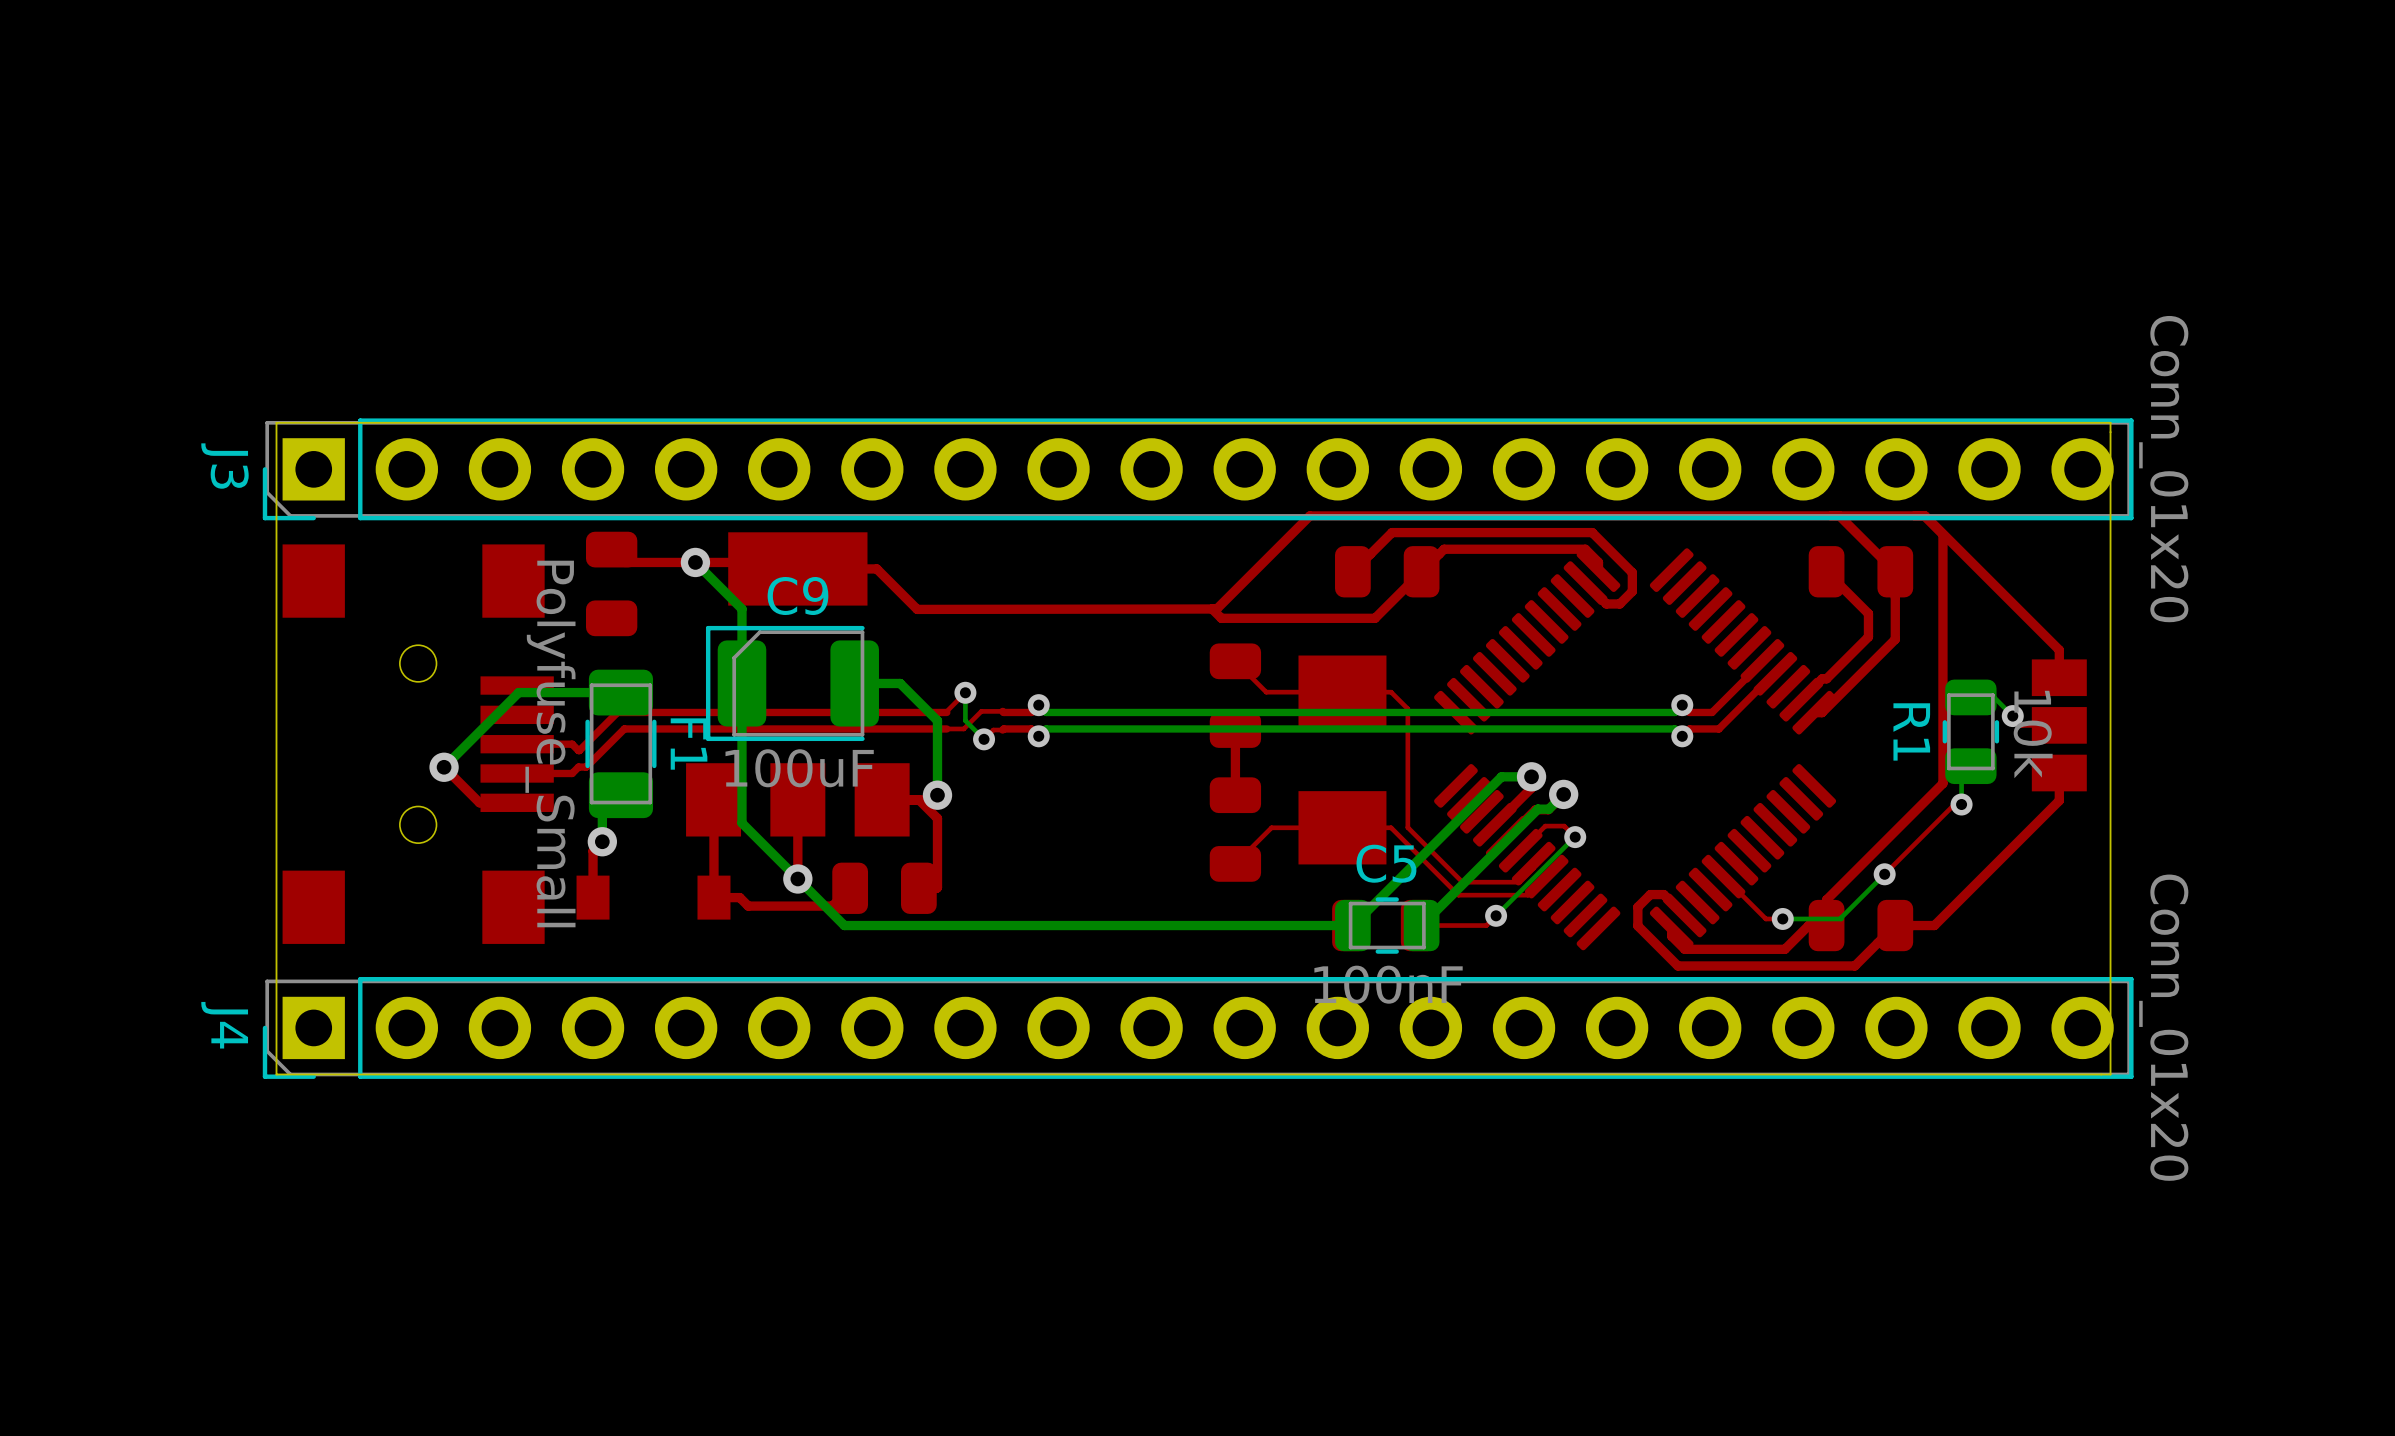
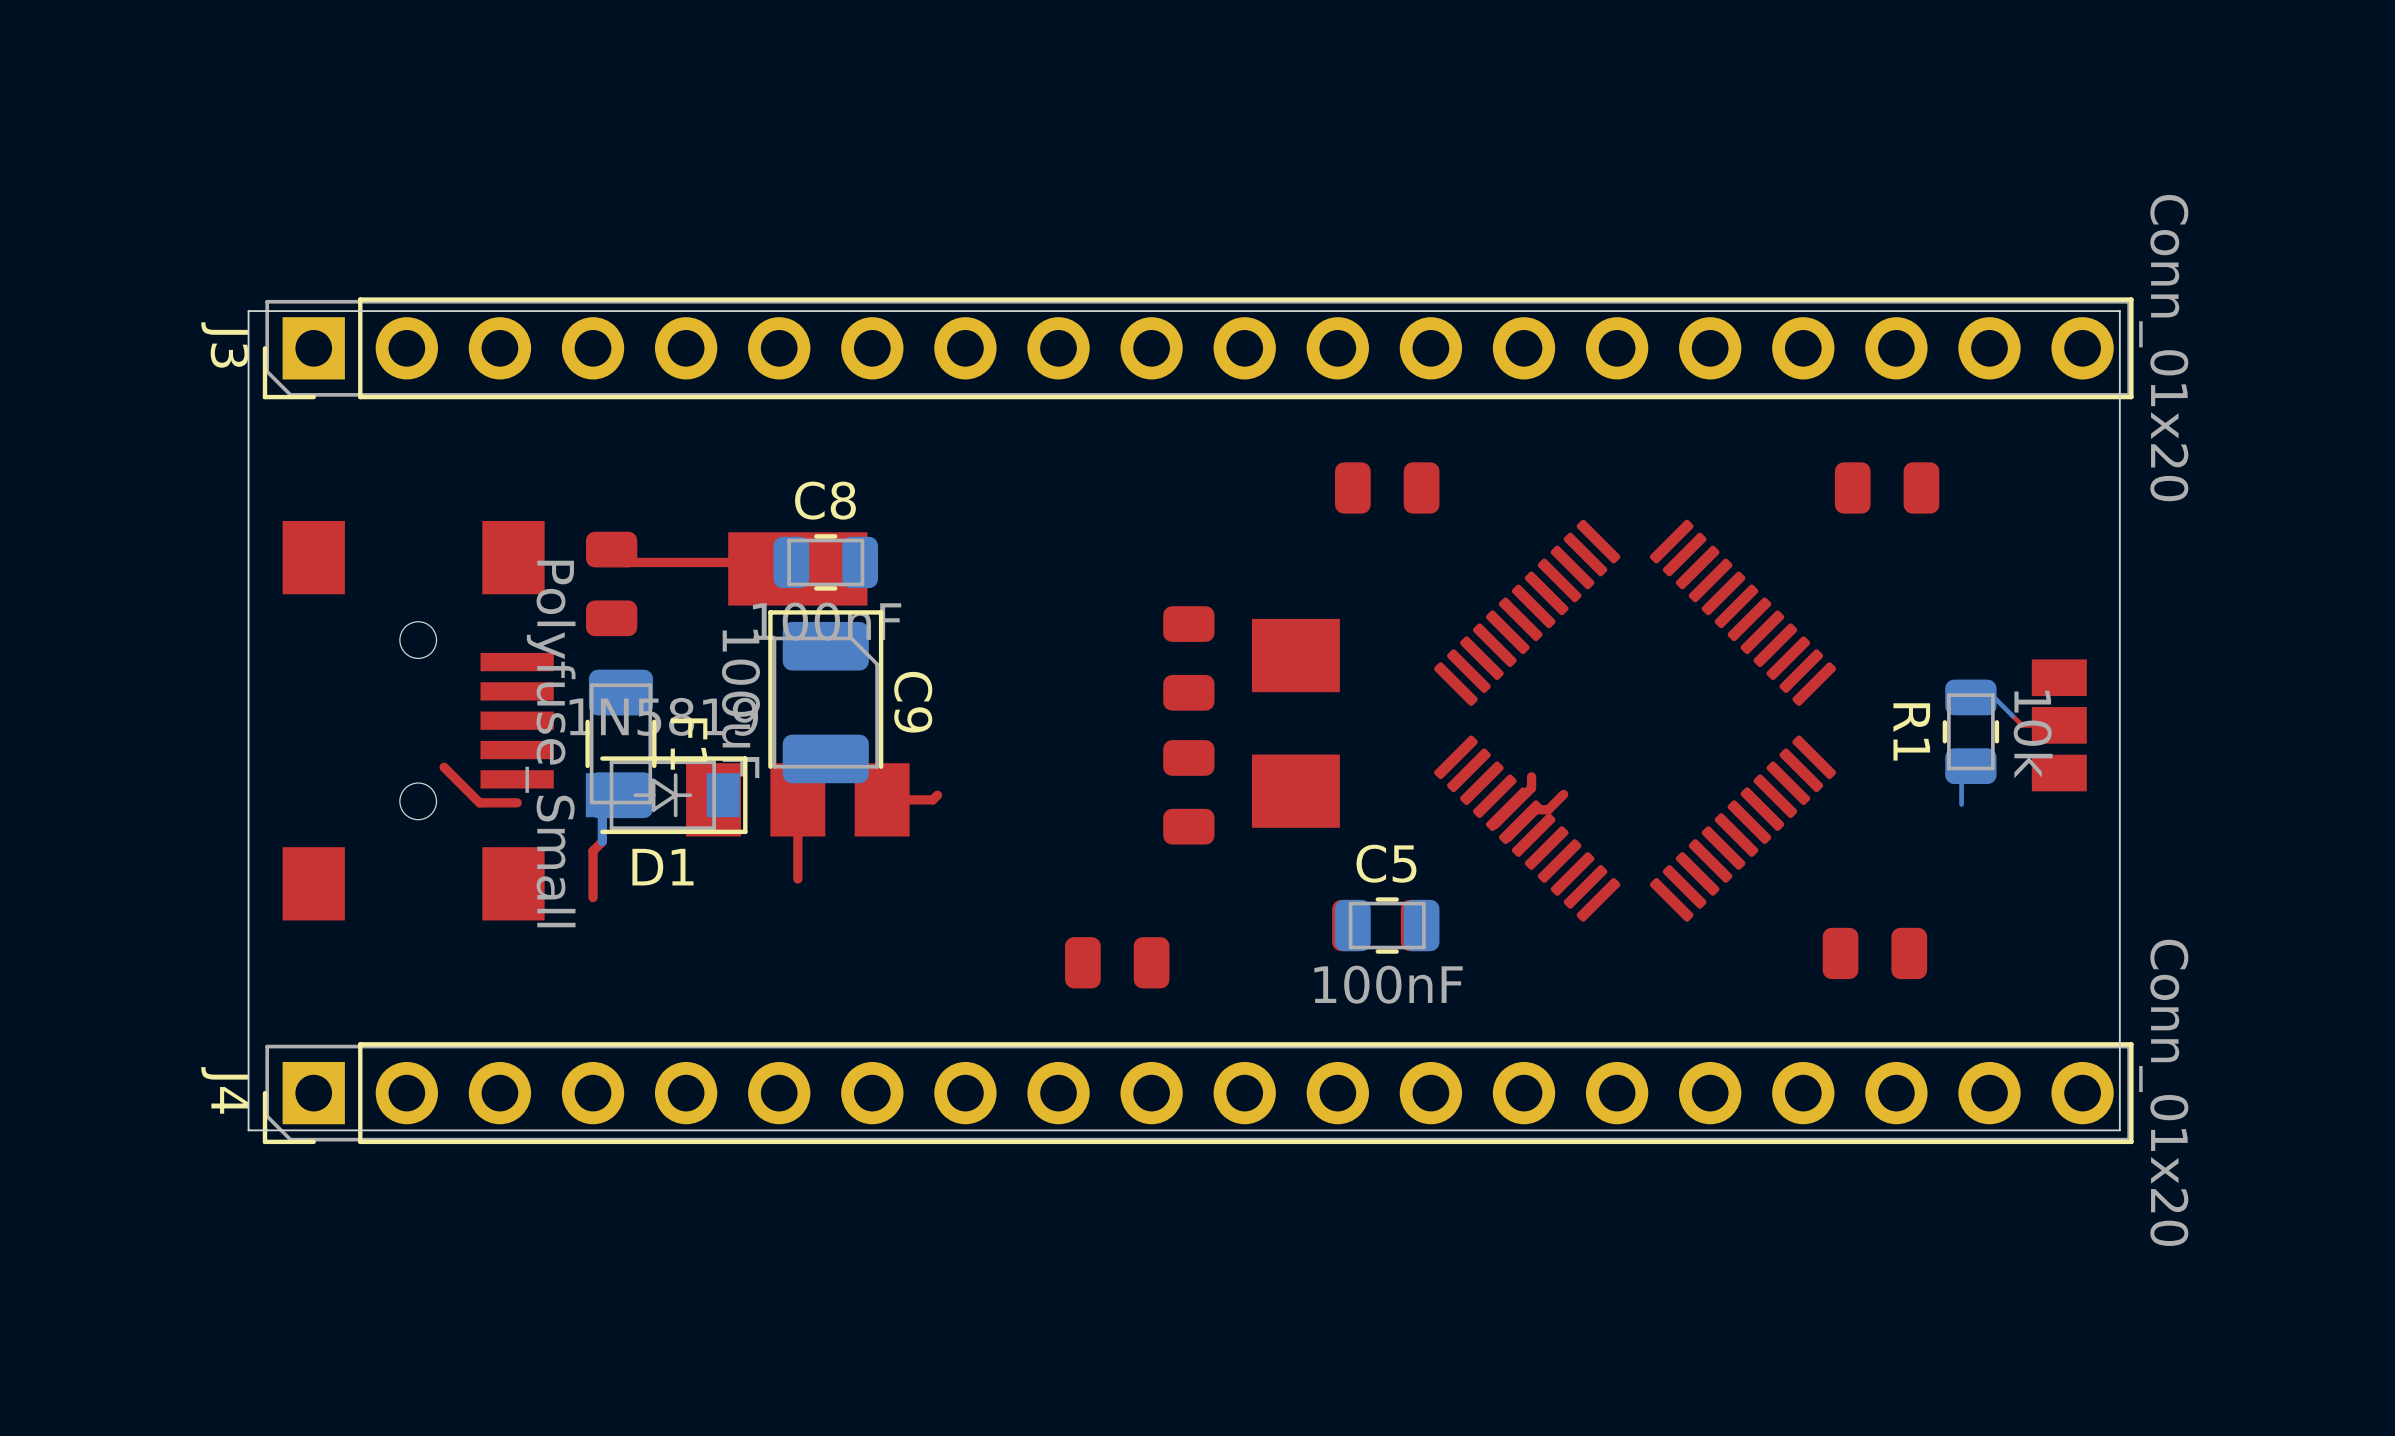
board edge: (2110, 422) (2110, 1074) (276, 1074) (276, 422) (2110, 422) -> (2119, 311) (2119, 1130) (248, 1130) (248, 311) (2119, 311)
J3 position: (1198, 469) -> (1198, 348)
top track: (1831, 515) (1839, 515) (1895, 571) (1895, 639) (1822, 712) (1814, 712) -> none
top track: (1831, 515) (1309, 515) (1216, 609) (1212, 609) -> none
top track: (1831, 515) (1925, 515) (2059, 650) (2059, 677) -> none
top track: (1924, 515) (1942, 534) (1942, 783) (1826, 899) (1826, 925) (1808, 925) (1784, 949) (1684, 949) (1671, 936) (1671, 928) -> none
top track: (778, 549) (797, 568) (876, 568) (917, 609) (1212, 609) -> none
bottom track: (695, 562) (741, 609) (741, 823) (844, 925) (1352, 925) (1501, 776) (1531, 776) -> none
via: (695, 562) -> none
top track: (1598, 570) (1598, 562) (1585, 549) (1444, 549) (1375, 618) (1221, 618) (1212, 609) -> none
top track: (1352, 571) (1392, 532) (1592, 532) (1632, 572) (1632, 591) (1619, 603) (1606, 603) (1585, 583) -> none
part position: (1387, 571) -> (1387, 487)
top track: (1826, 571) (1868, 613) (1868, 636) (1826, 678) (1822, 678) (1801, 699) -> none
part position: (1860, 571) -> (1887, 487)
part: none -> (1188, 658)
top track: (1762, 660) (1712, 712) (1689, 712) (1682, 705) -> none
top track: (1235, 661) (1266, 692) (1391, 692) (1407, 708) (1407, 827) (1462, 882) (1519, 882) (1533, 868) (1533, 863) -> none
top track: (1775, 673) (1718, 728) (1689, 728) (1682, 736) -> none
C9 rotation: 0° (792, 683) -> 90° clockwise (825, 696)
bottom track: (854, 683) (900, 683) (937, 720) (937, 795) -> none
bottom track: (620, 692) (518, 692) (444, 767) -> none
top track: (965, 692) (946, 712) (617, 712) (579, 750) (572, 744) (517, 744) -> none
bottom track: (965, 692) (965, 720) (984, 739) -> none
via: (965, 692) -> none
part: (1235, 695) -> none
top track: (1038, 705) (1031, 712) (981, 711) (963, 728) (624, 728) (586, 767) (578, 767) (572, 773) (517, 773) -> none
via: (1038, 705) -> none
bottom track: (1682, 705) (1674, 712) (1046, 712) (1038, 705) -> none
via: (1682, 705) -> none
via: (2012, 716) -> none
top track: (1235, 730) (1235, 795) -> none
top track: (1038, 736) (1031, 728) (1003, 728) (993, 730) (984, 739) -> none
via: (1038, 736) -> none
bottom track: (1682, 736) (1674, 728) (1046, 728) (1038, 736) -> none
via: (1682, 736) -> none
via: (984, 739) -> none
part position: (418, 744) -> (418, 720)
part position: (1635, 749) -> (1635, 720)
part position: (1342, 759) -> (1295, 723)
via: (444, 767) -> none
top track: (2059, 773) (2059, 800) (1934, 925) (1895, 925) (1854, 965) (1677, 965) (1637, 925) (1637, 907) (1650, 894) (1663, 894) (1684, 915) -> none
via: (1531, 776) -> none
part: none -> (1188, 792)
bottom track: (1563, 794) (1548, 809) (1537, 809) (1421, 925) -> none
via: (1563, 794) -> none
via: (937, 795) -> none
top track: (918, 799) (937, 818) (937, 887) (918, 888) -> none
top track: (713, 800) (713, 897) (739, 897) (748, 906) (832, 906) (850, 888) -> none
top track: (1961, 804) (1954, 804) (1884, 874) -> none
via: (1961, 804) -> none
part: (1235, 829) -> none
top track: (1575, 837) (1564, 826) (1545, 826) (1520, 850) -> none
via: (1575, 837) -> none
via: (602, 841) -> none
top track: (1235, 863) (1271, 827) (1391, 827) (1458, 895) (1528, 895) (1546, 876) -> none
bottom track: (1884, 874) (1841, 918) (1782, 918) -> none
via: (1884, 874) -> none
top track: (1723, 876) (1765, 918) (1782, 918) -> none
via: (797, 878) -> none
C8 side: top (884, 888) -> bottom (825, 562)
D1 side: top (653, 897) -> bottom (666, 795)
top track: (1496, 915) (1486, 925) (1418, 925) -> none
via: (1496, 915) -> none
via: (1782, 918) -> none
part position: (1860, 925) -> (1874, 953)
part: none -> (1117, 962)
J4 position: (1198, 1027) -> (1198, 1093)

